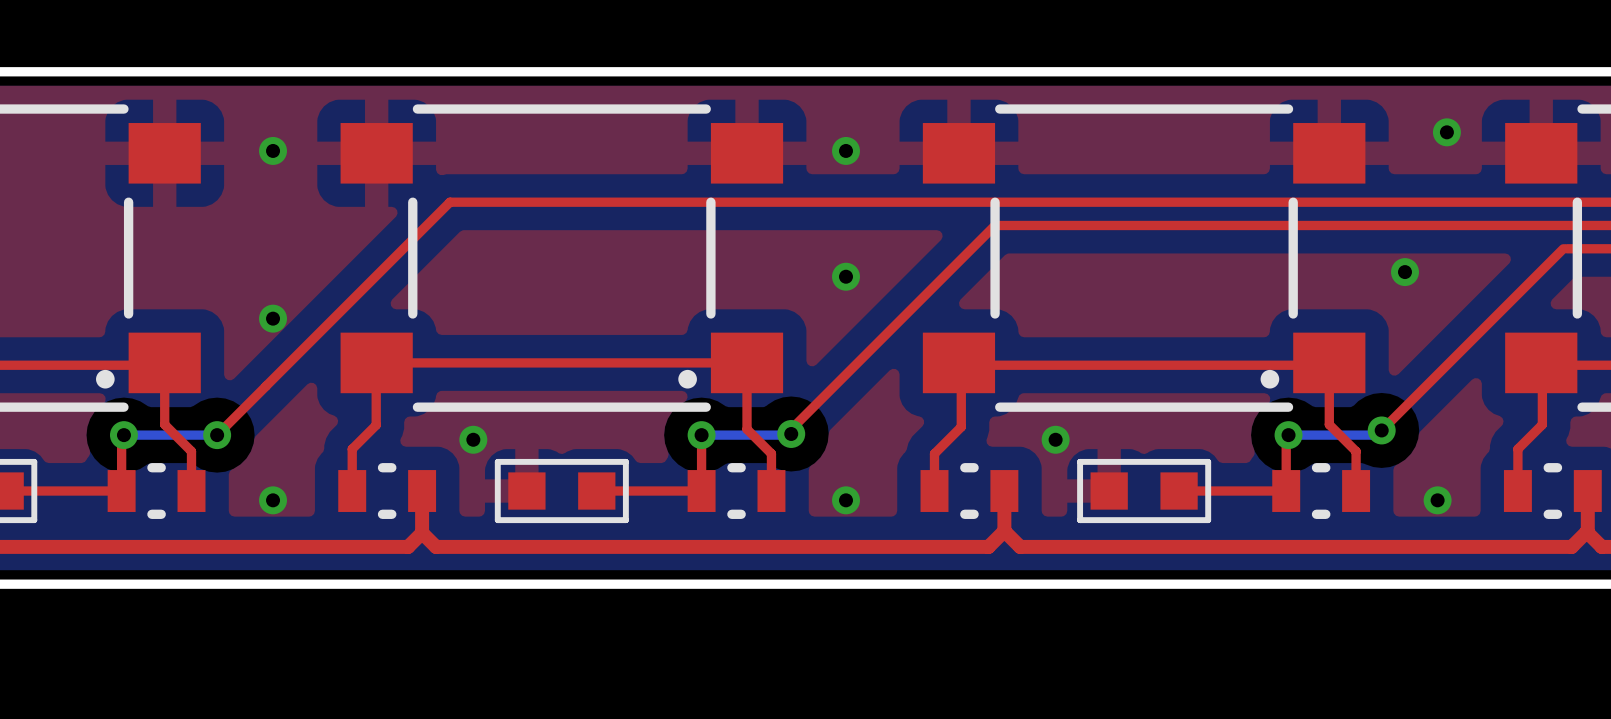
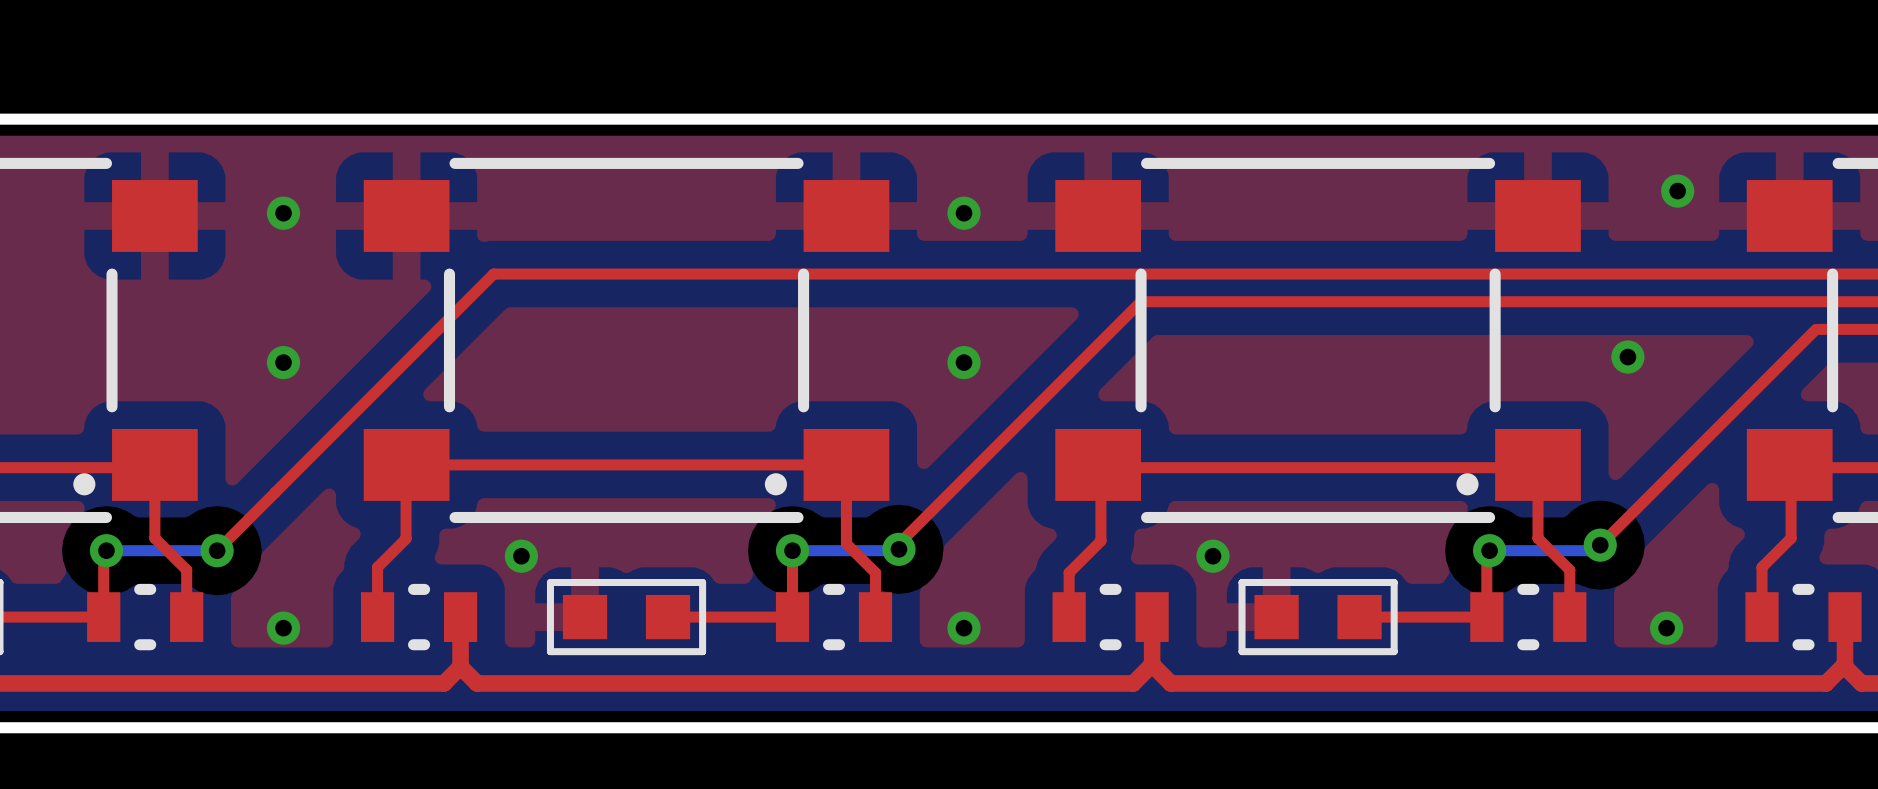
via position: (273, 318) -> (283, 362)

